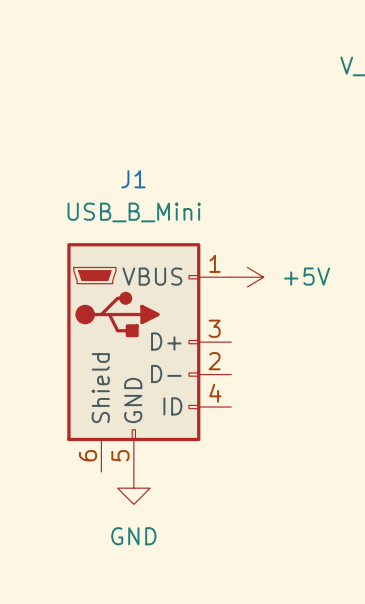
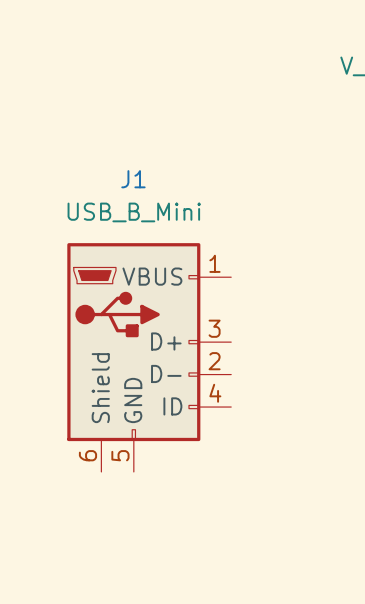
power symbol: +5V (247, 277) -> none
power symbol: GND (133, 488) -> none

